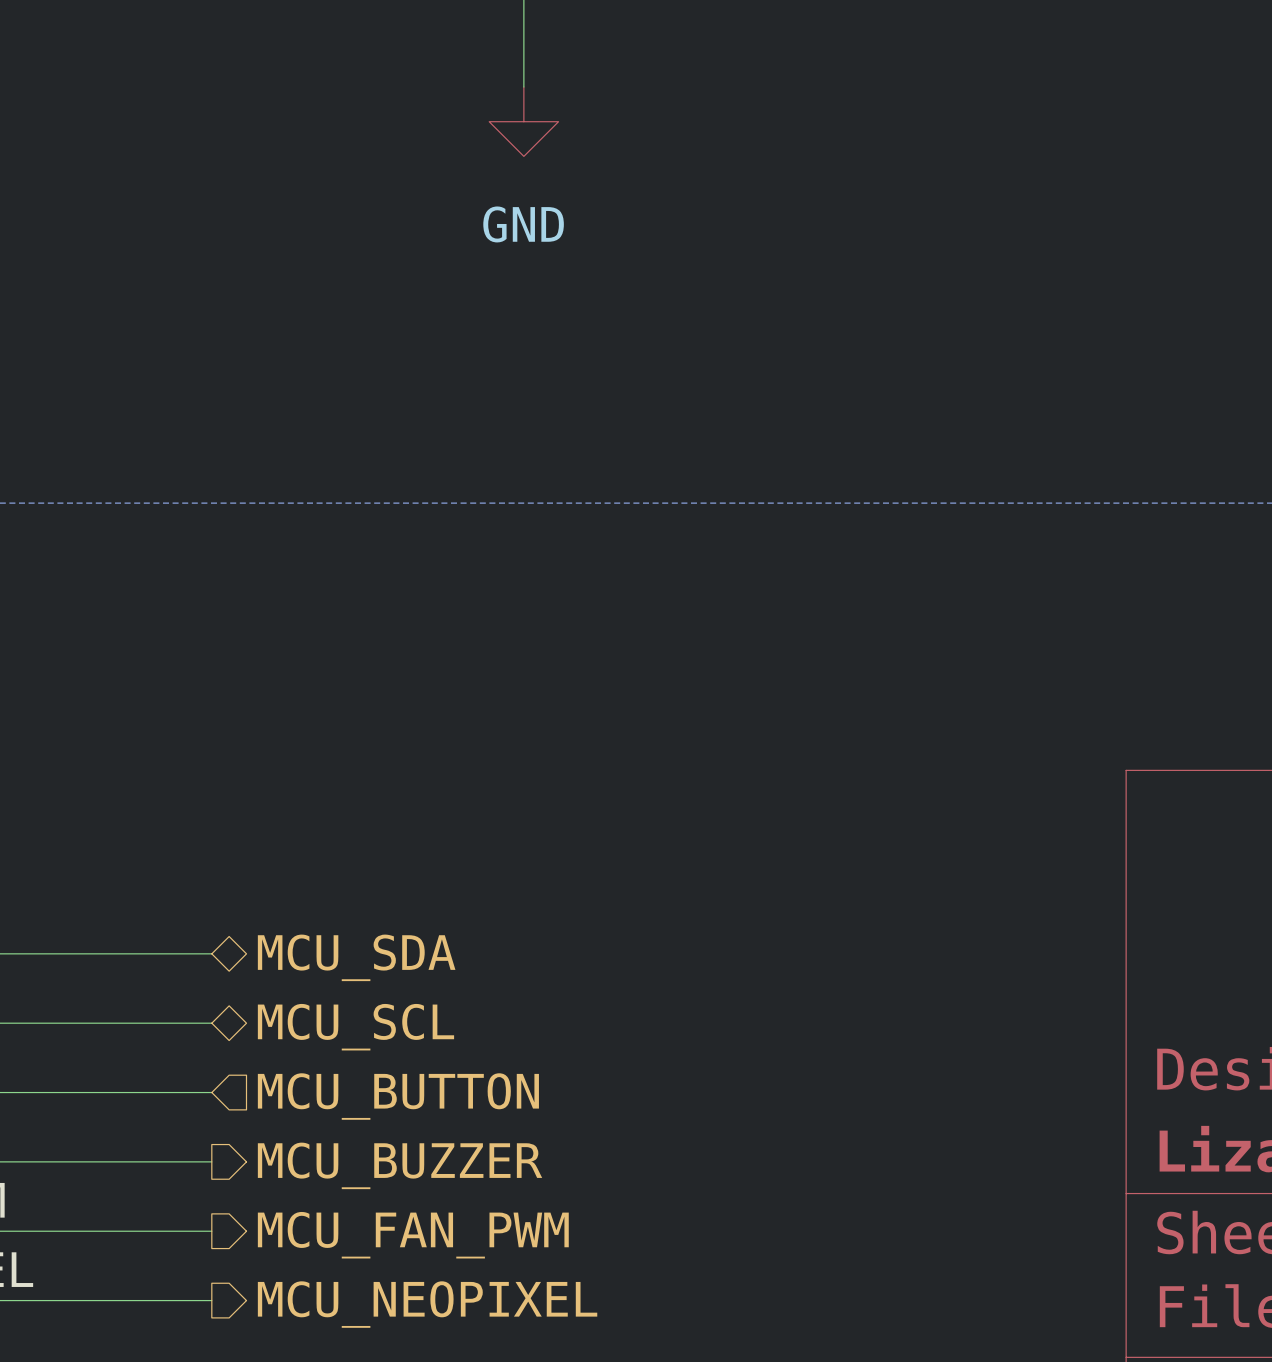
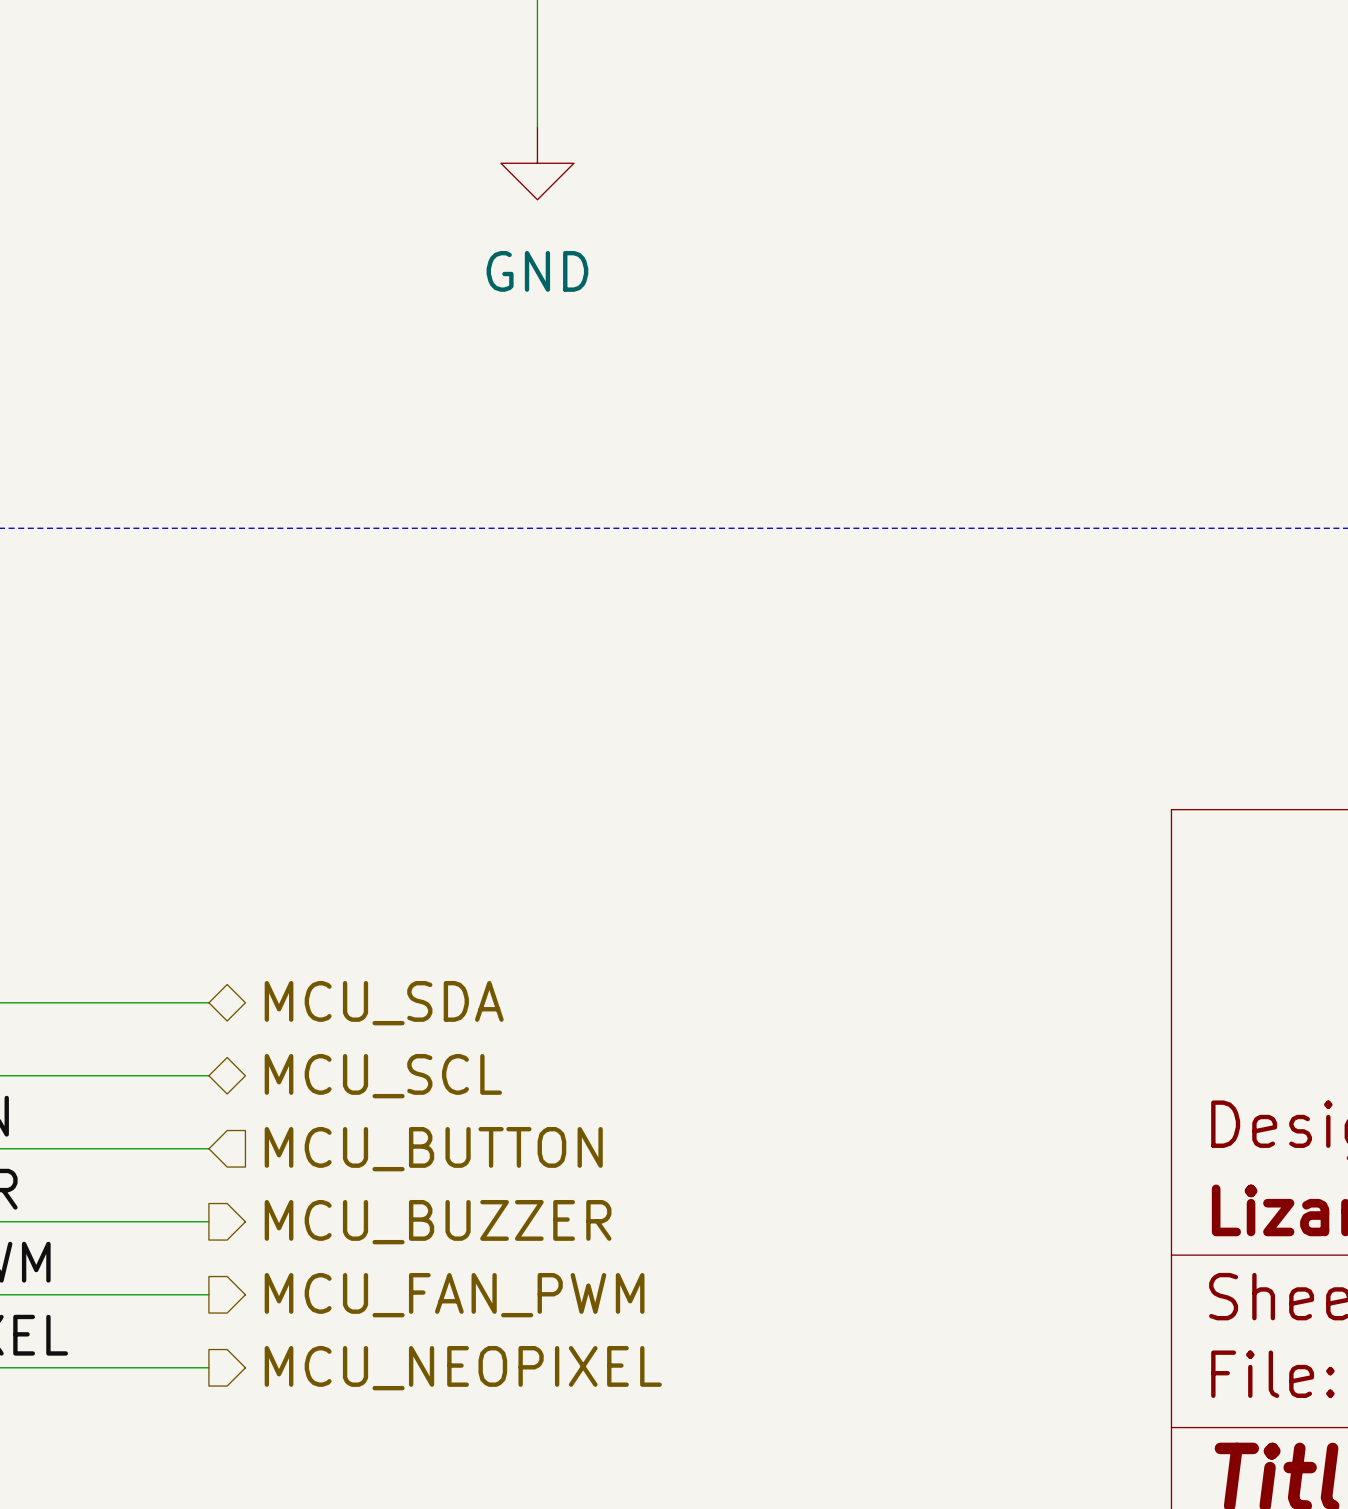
power symbol position: GND (523, 121) -> GND (537, 163)

